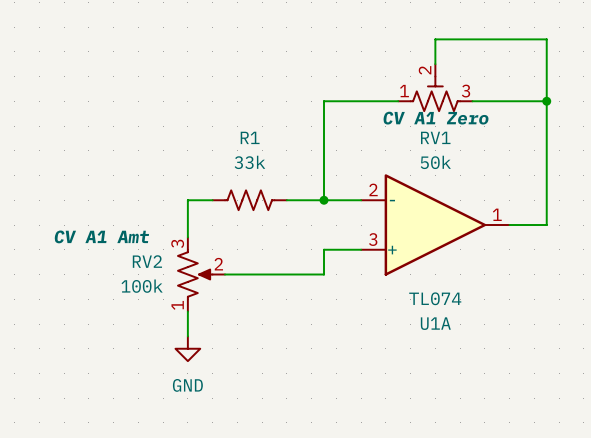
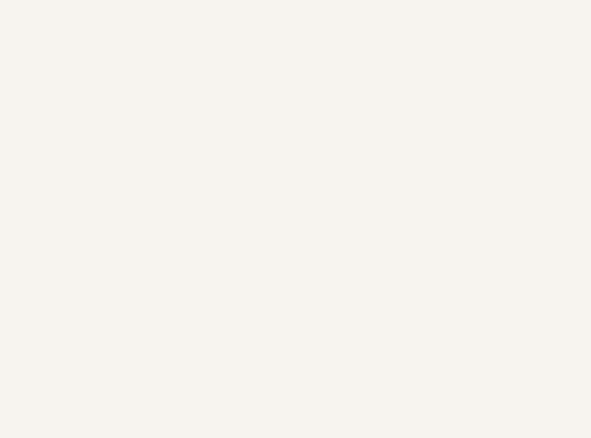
wire: (435, 64) (435, 39) (546, 39) (546, 225) (509, 225) -> none
RV1: 50k (435, 87) -> none
wire: (398, 101) (324, 101) (324, 200) -> none
wire: (472, 101) (546, 101) -> none
junction: (546, 101) -> none
wire: (212, 200) (187, 200) (187, 237) -> none
R1: 33k (249, 200) -> none
wire: (286, 200) (361, 200) -> none
junction: (324, 200) -> none
U1A: TL074 (435, 225) -> none
wire: (361, 249) (324, 249) (324, 274) (225, 274) -> none
RV2: 100k (201, 274) -> none
wire: (187, 311) (187, 336) -> none
power symbol: GND (187, 348) -> none

